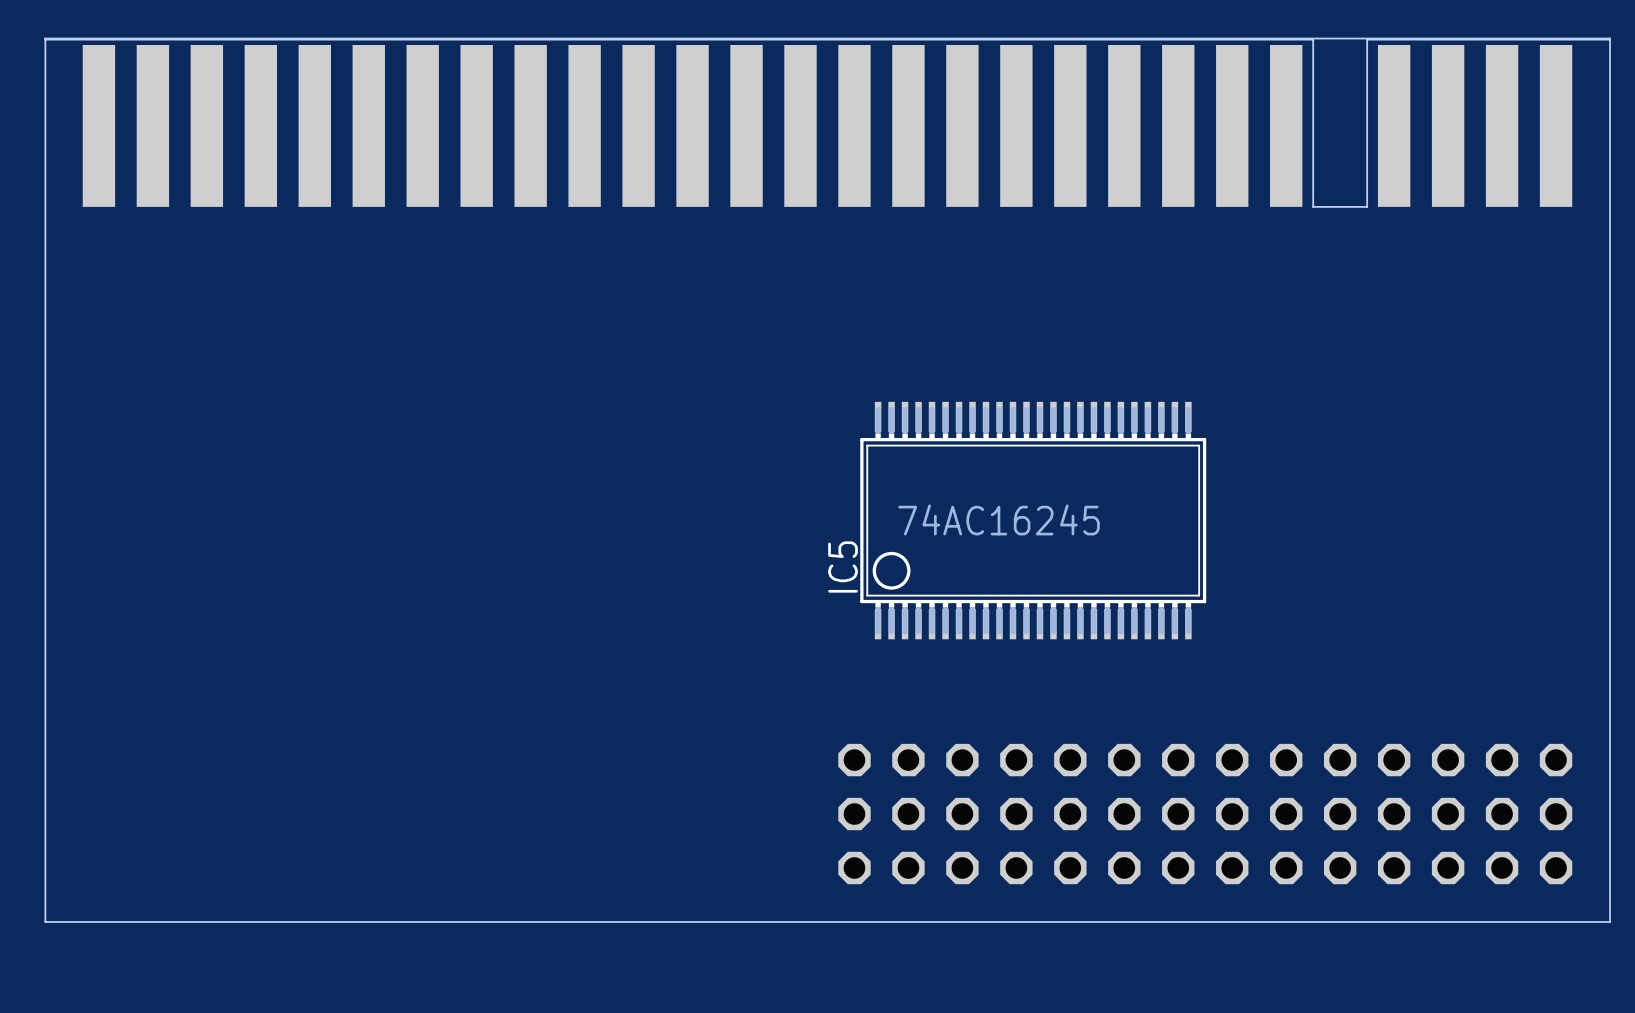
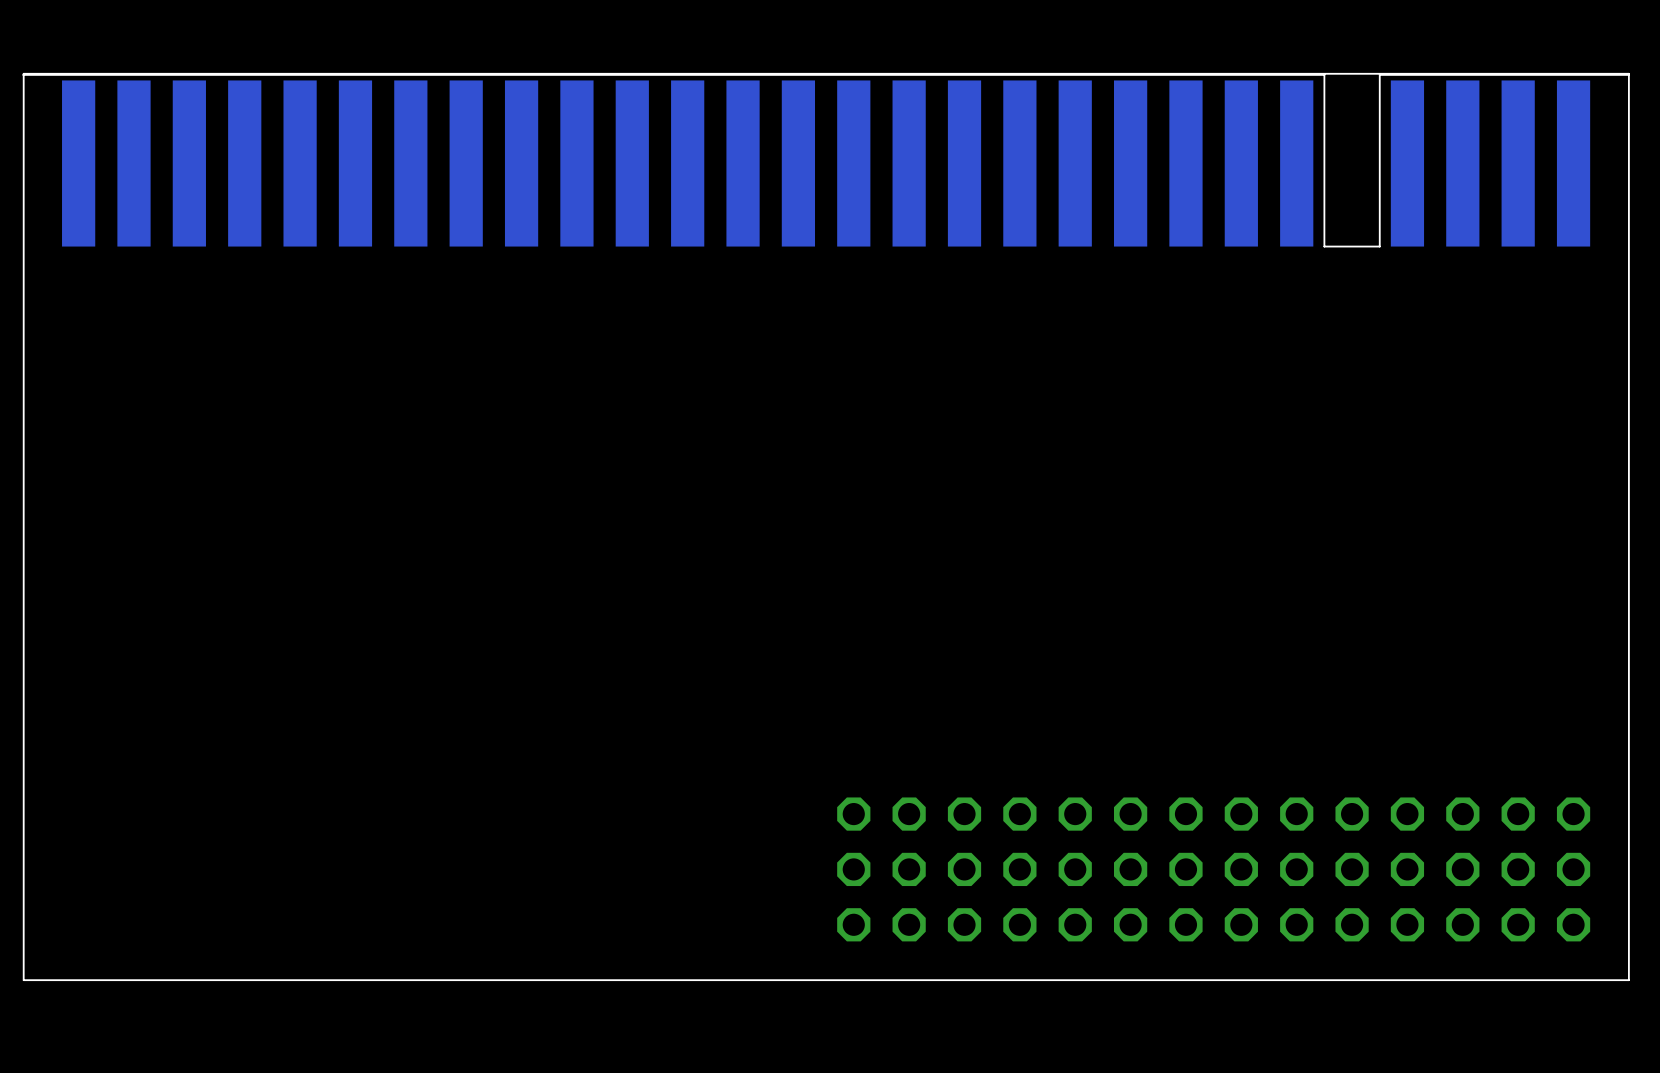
IC5: 74AC16245 (1033, 520) -> none

